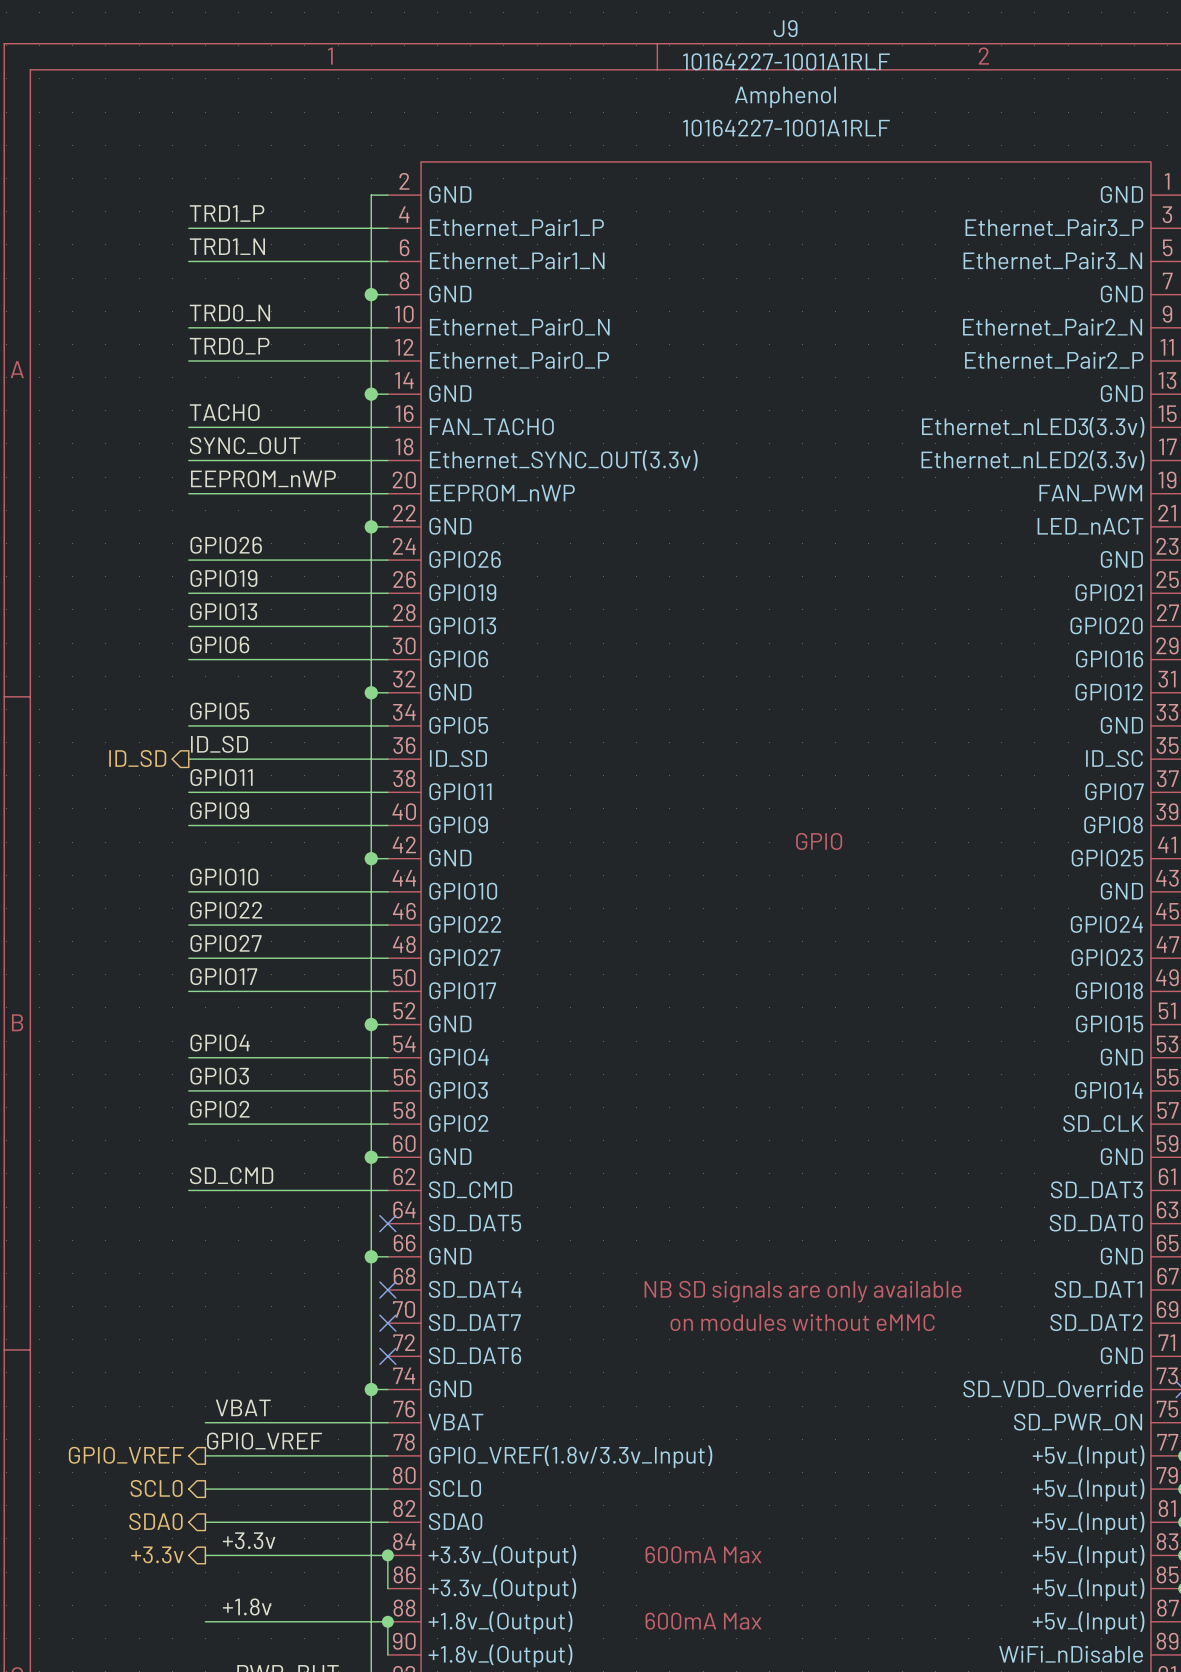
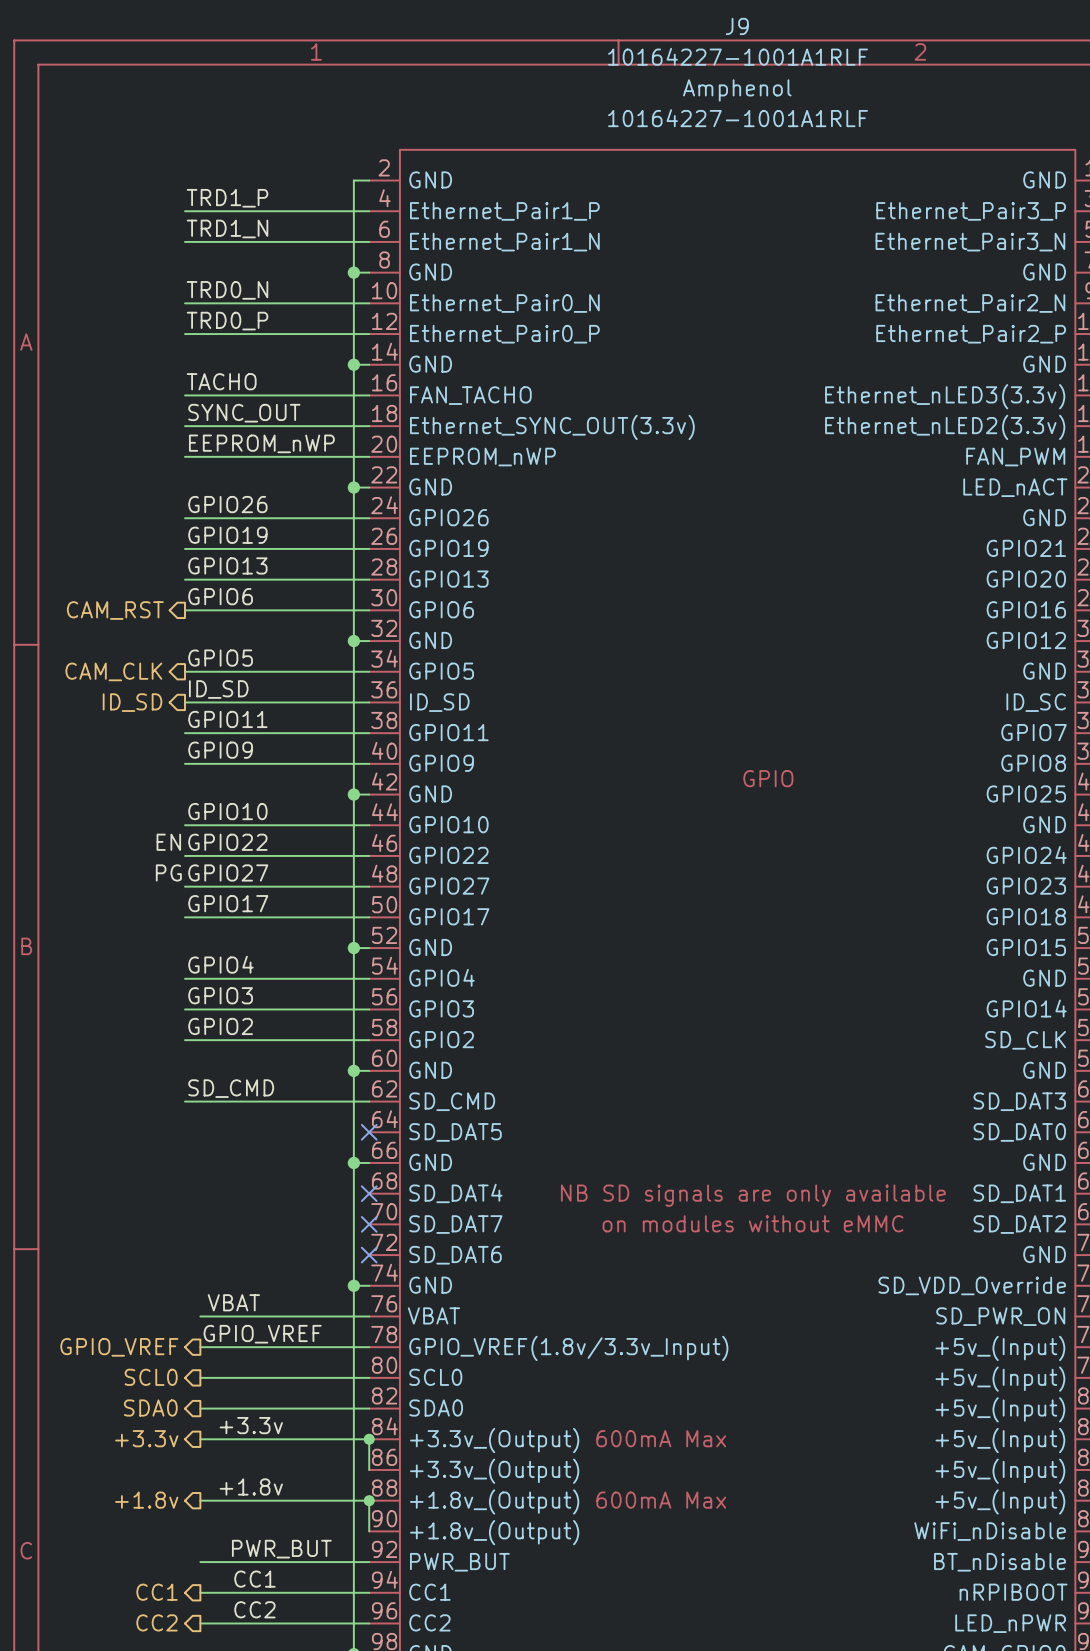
hierarchical label: none -> CAM_RST (115, 610)
hierarchical label: none -> CAM_CLK (113, 671)
label: none -> EN (168, 842)
label: none -> PG (168, 872)
hierarchical label: none -> +1.8v (146, 1500)

